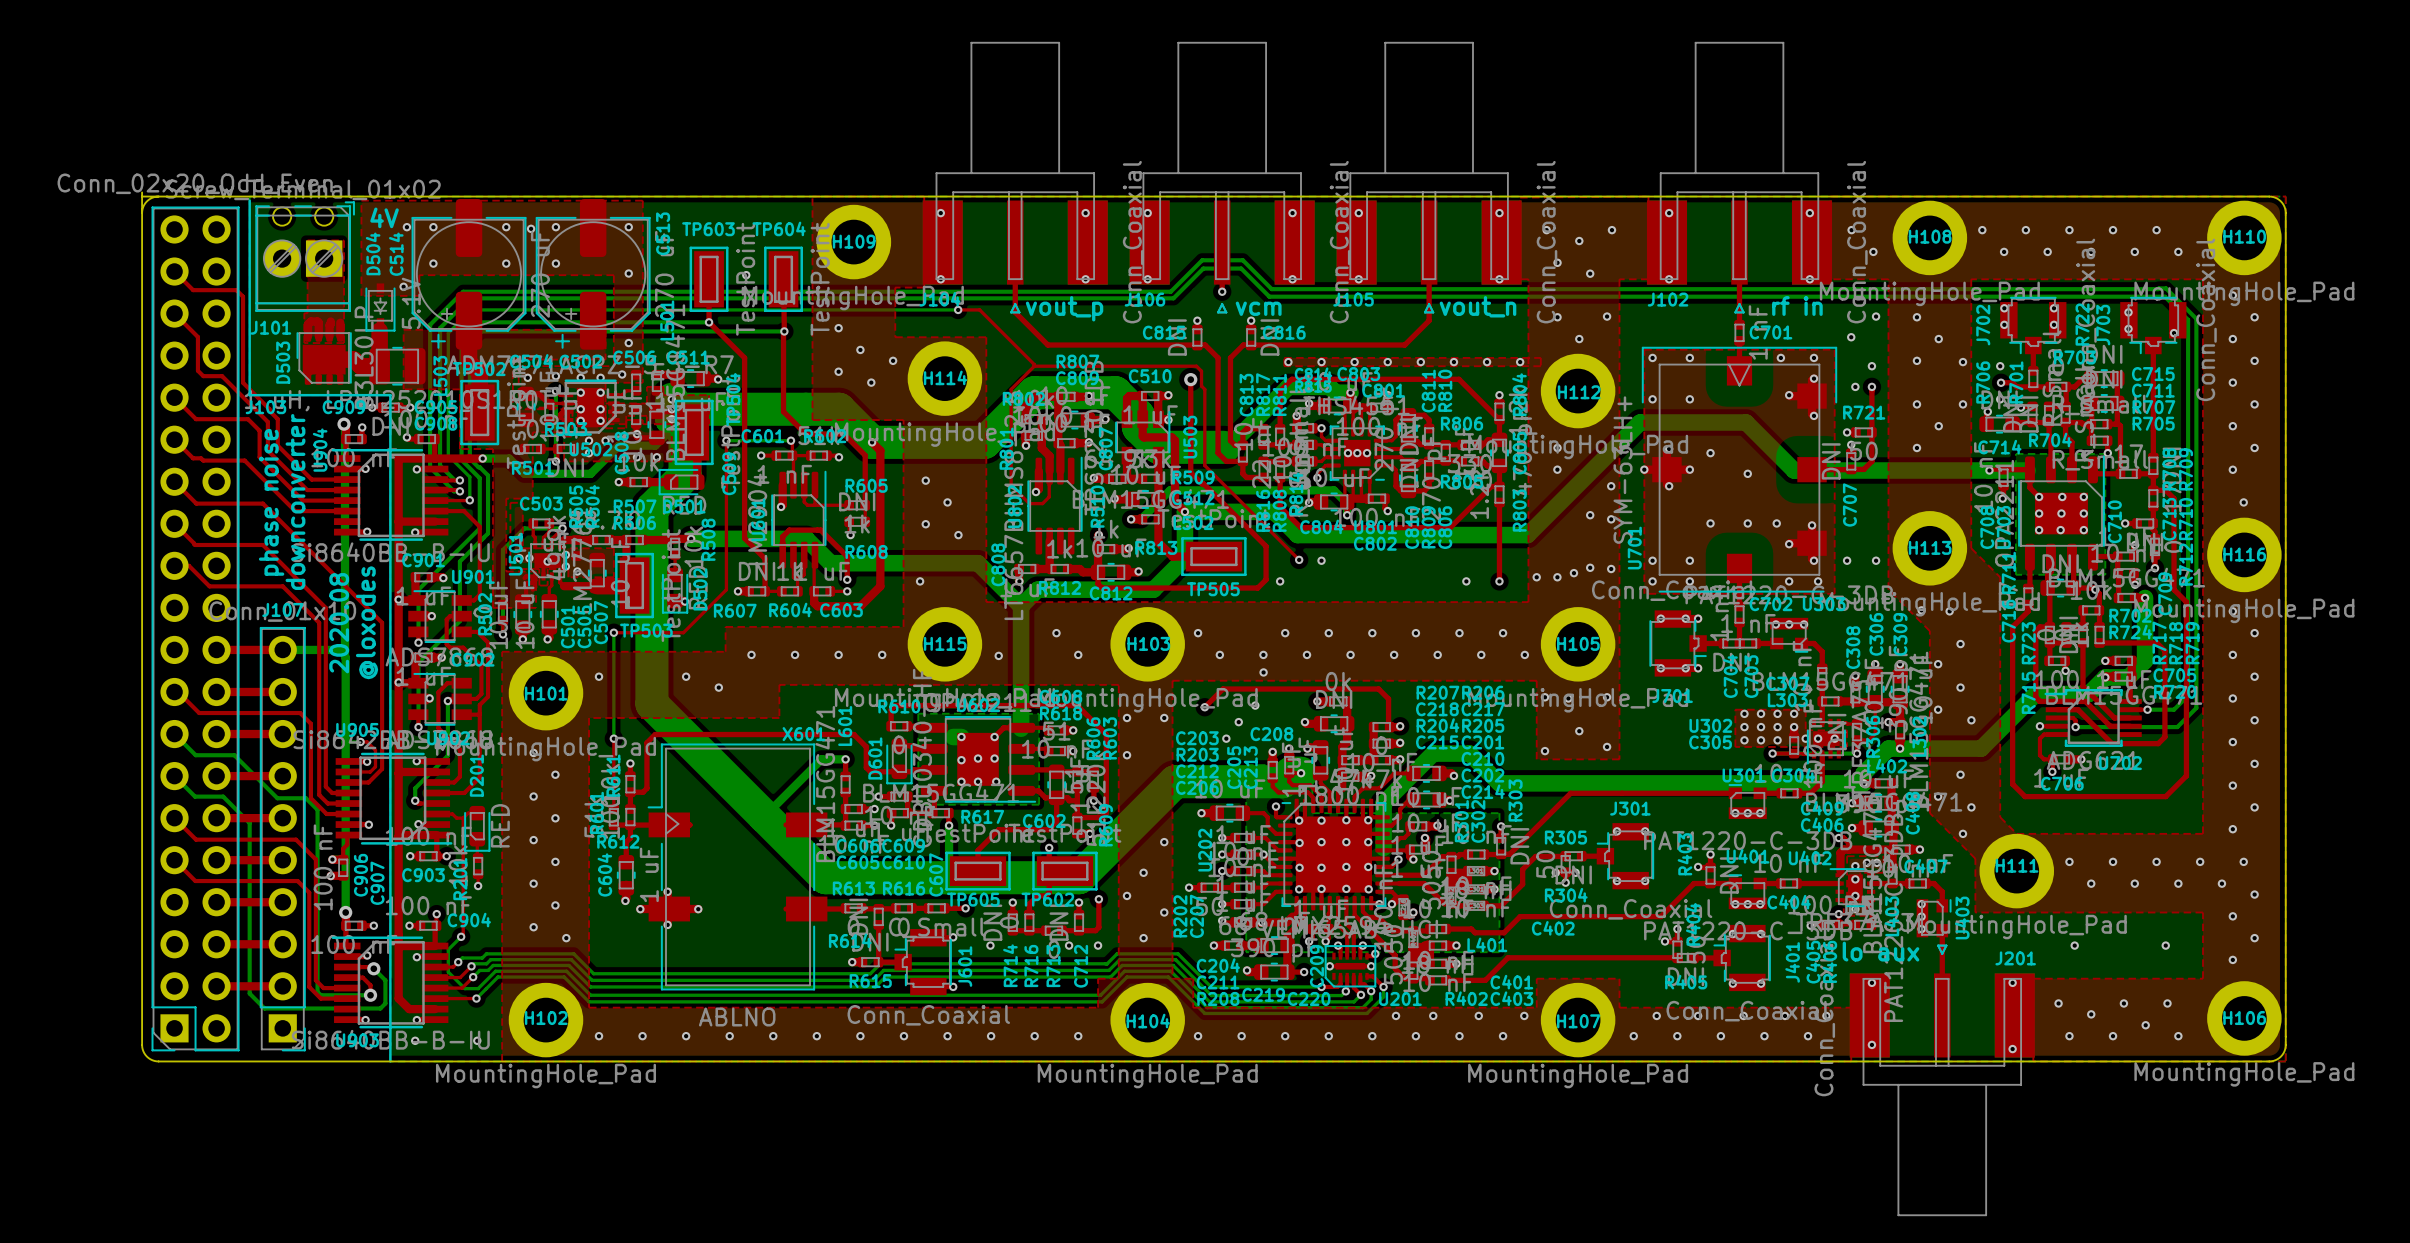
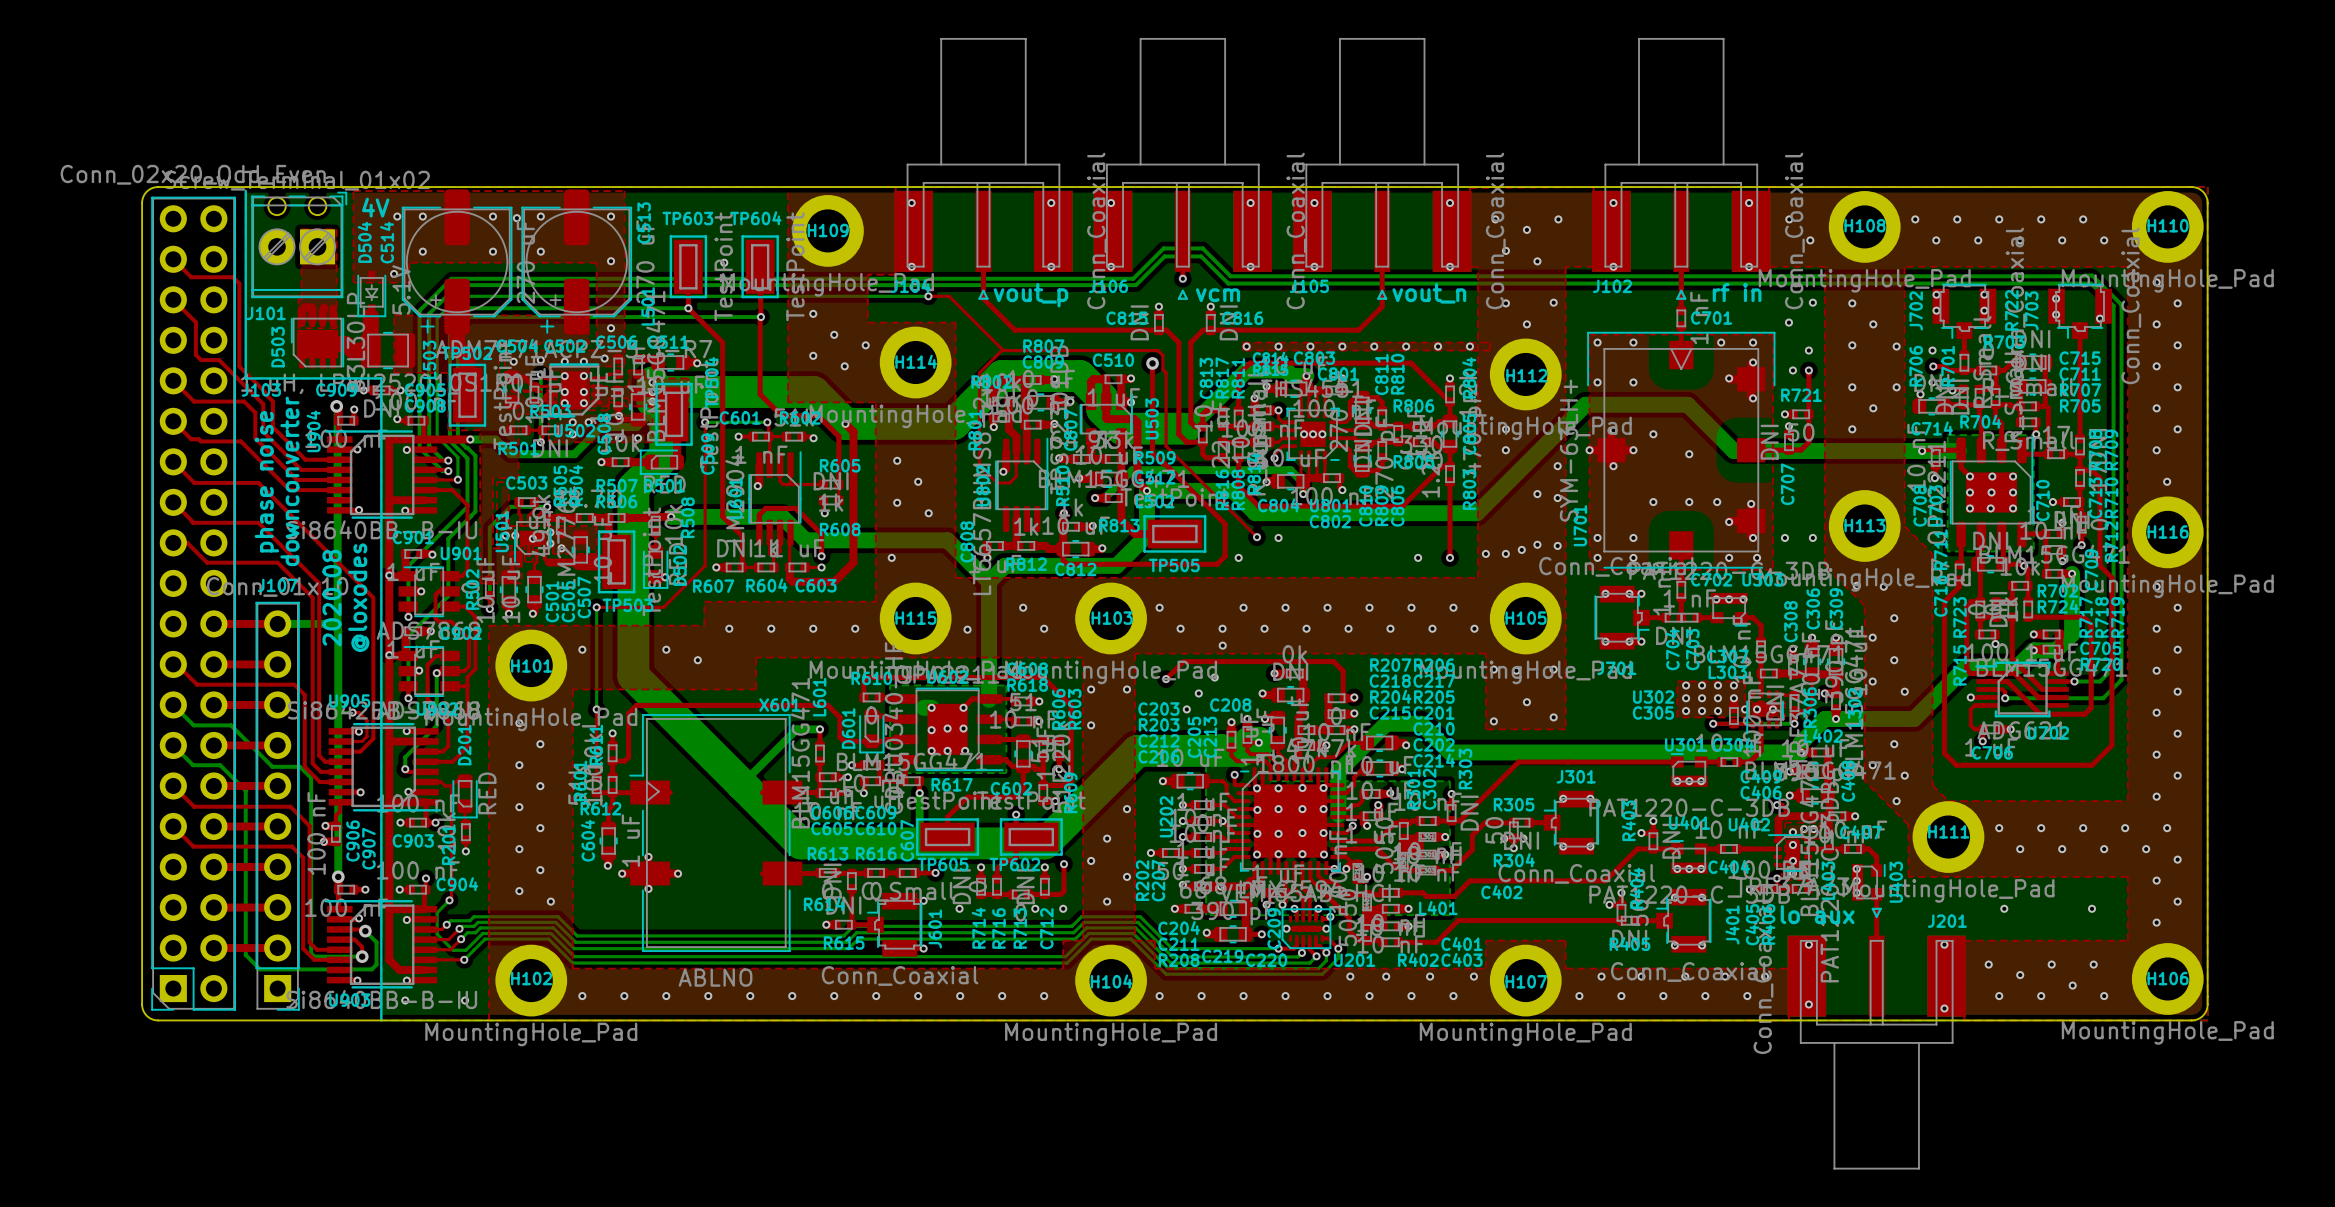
board edge: (142, 192) (142, 213) -> none
board edge: (142, 196) (158, 196) -> none

